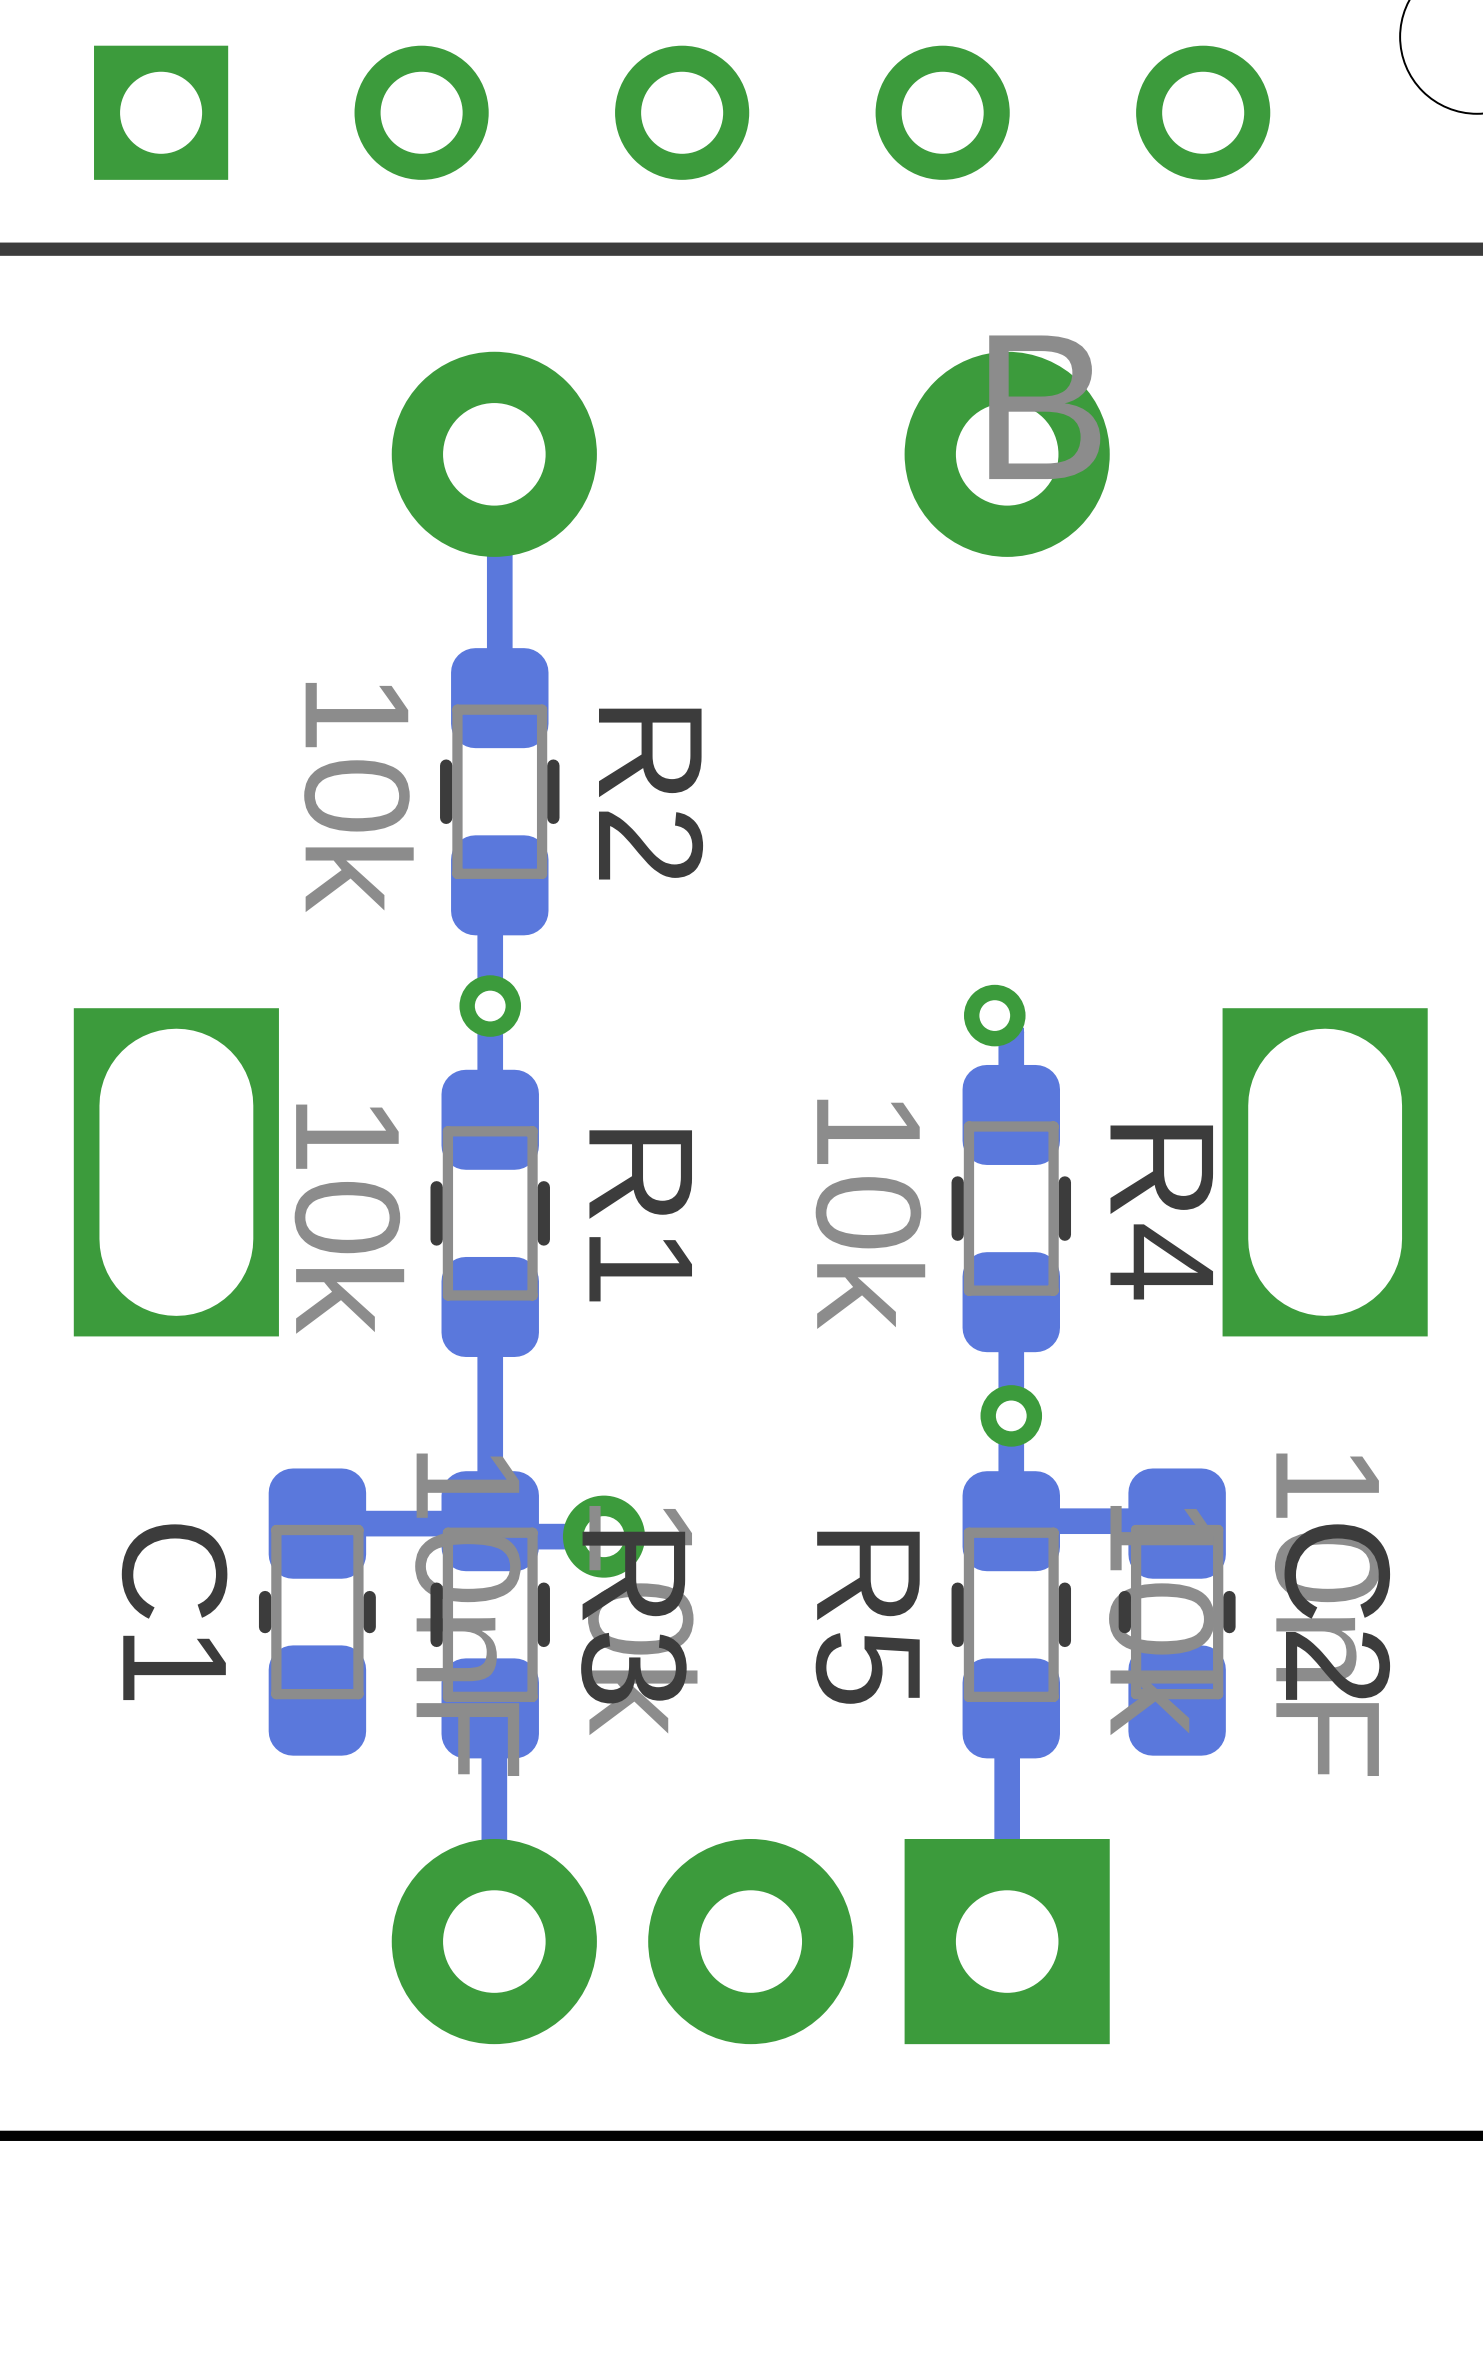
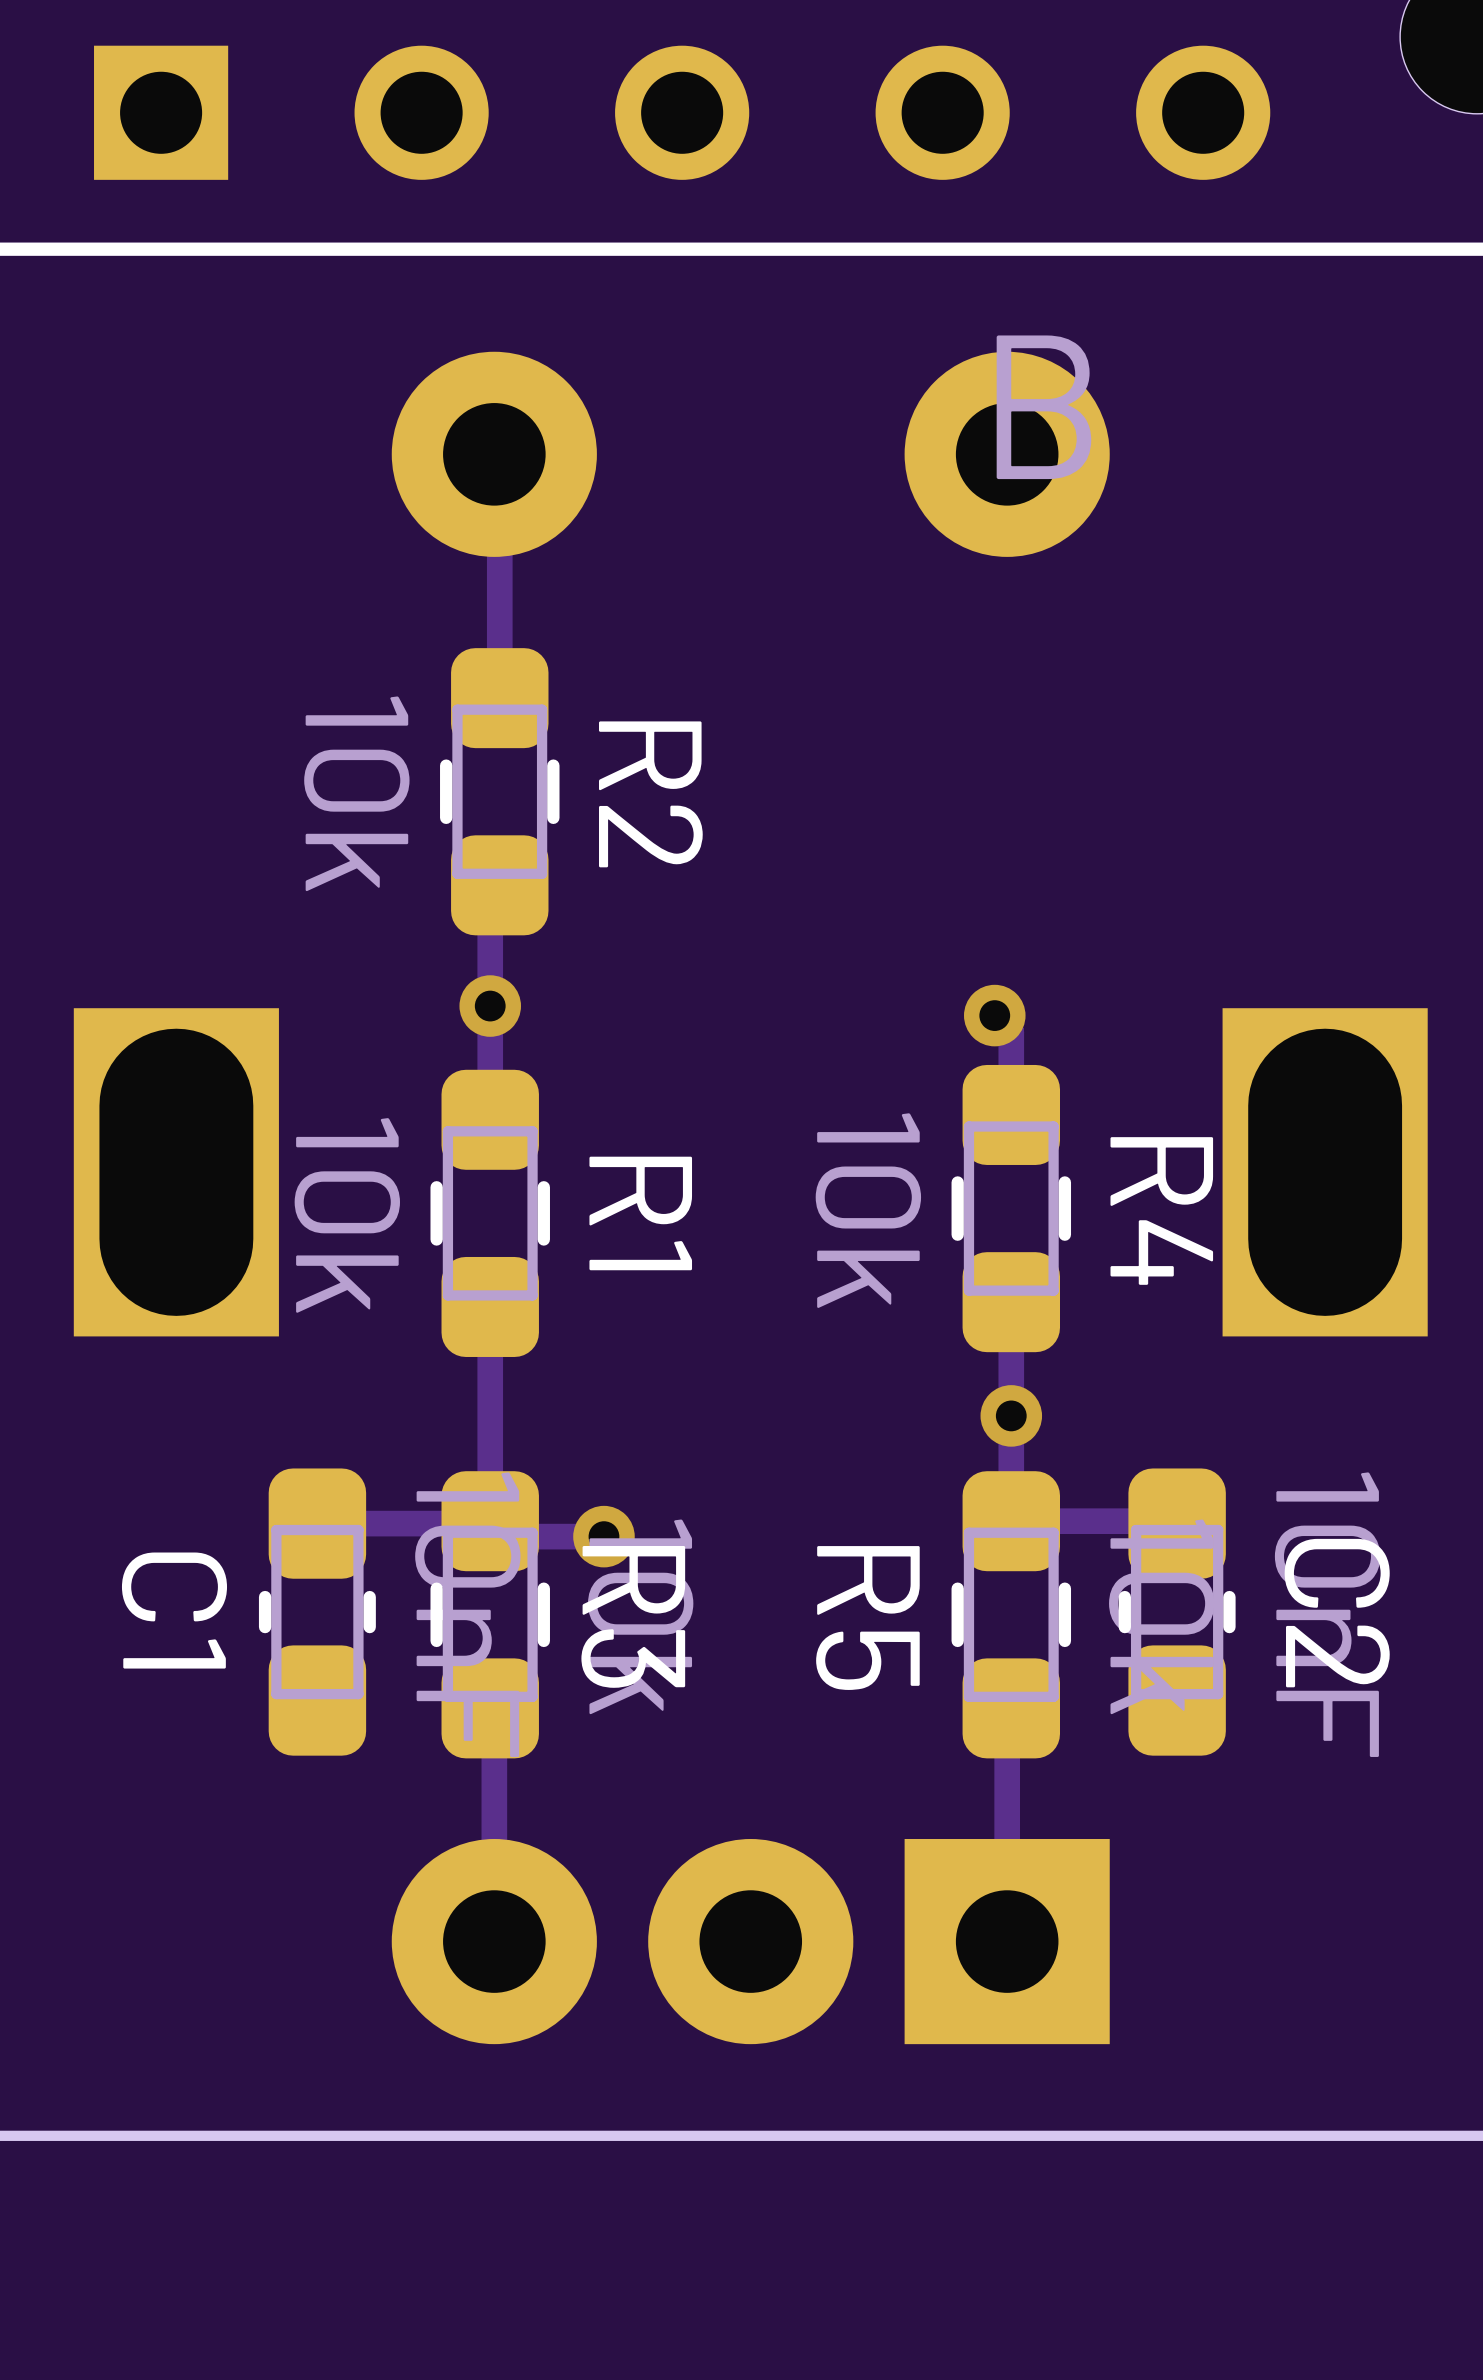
via size: [562, 1495, 646, 1578] -> [573, 1505, 635, 1568]

